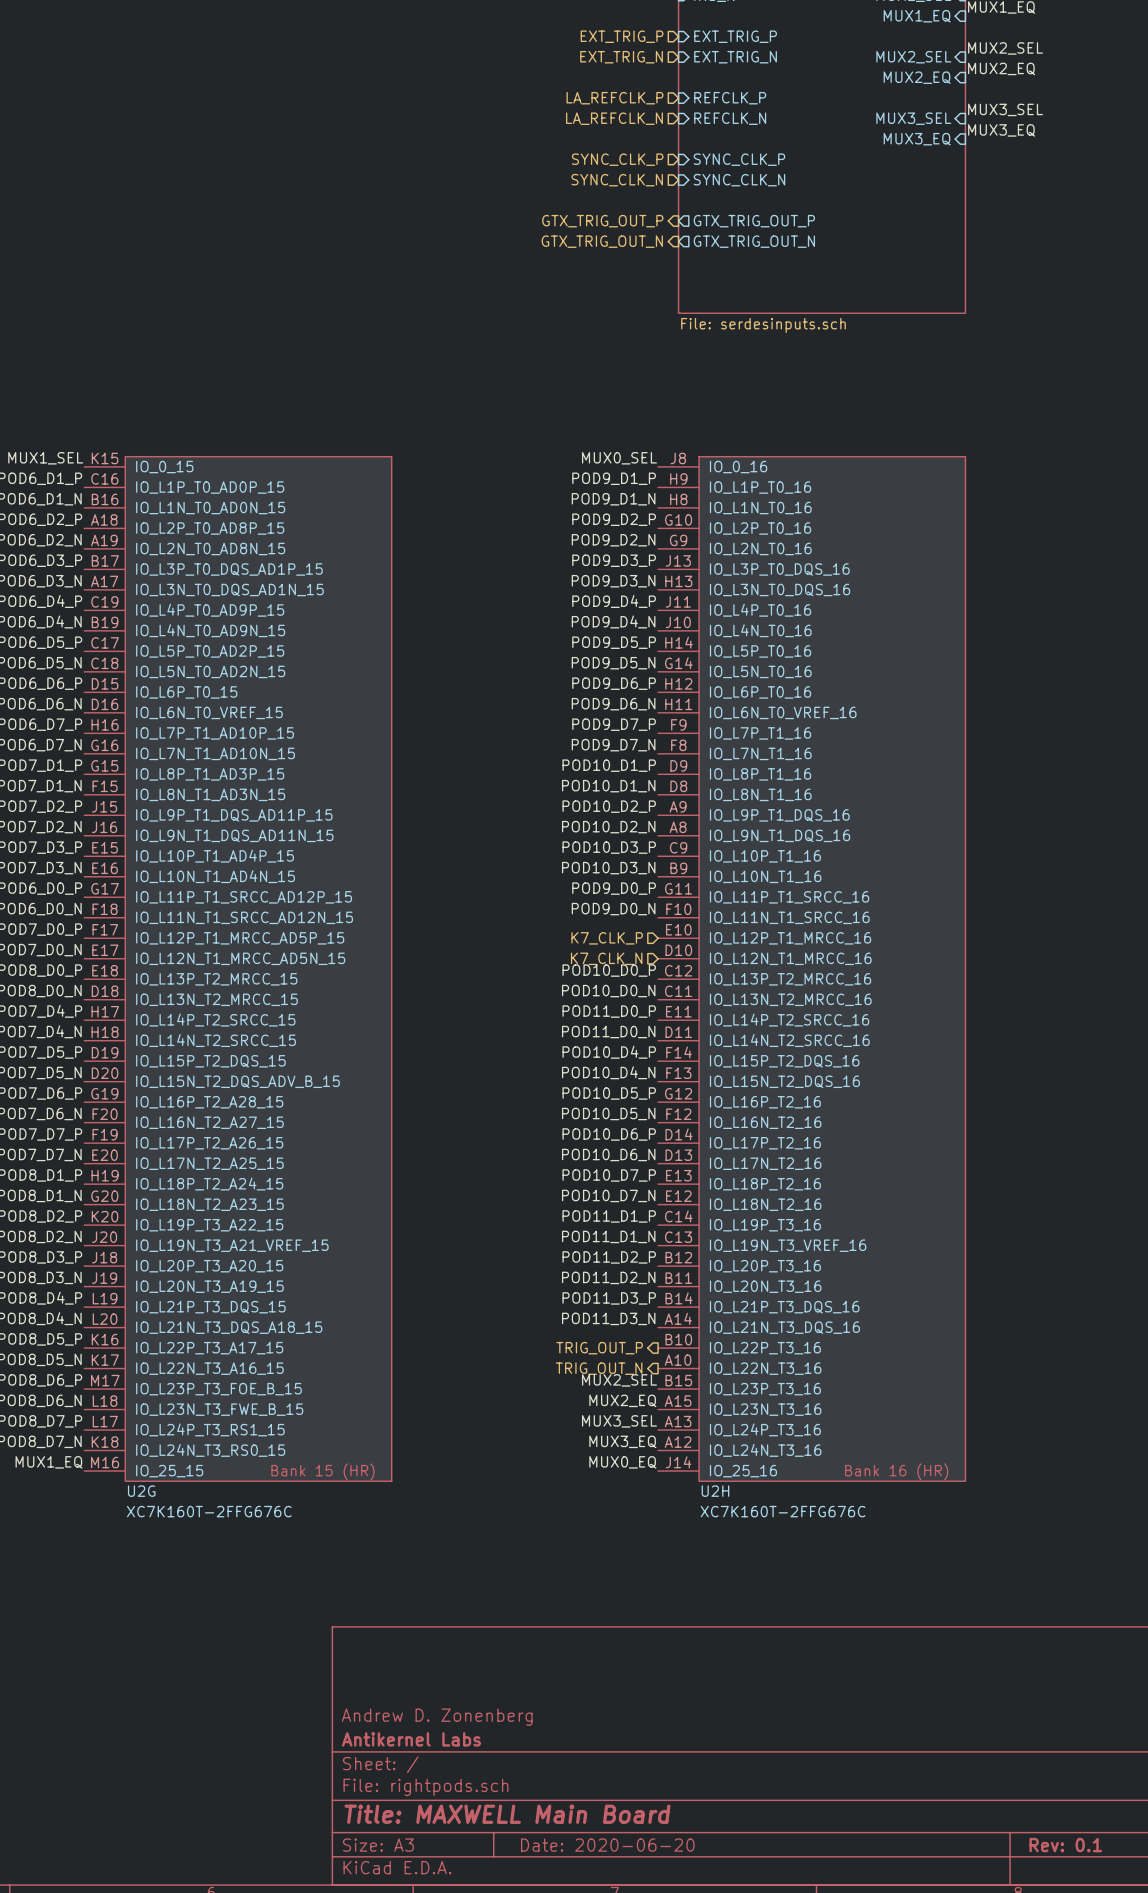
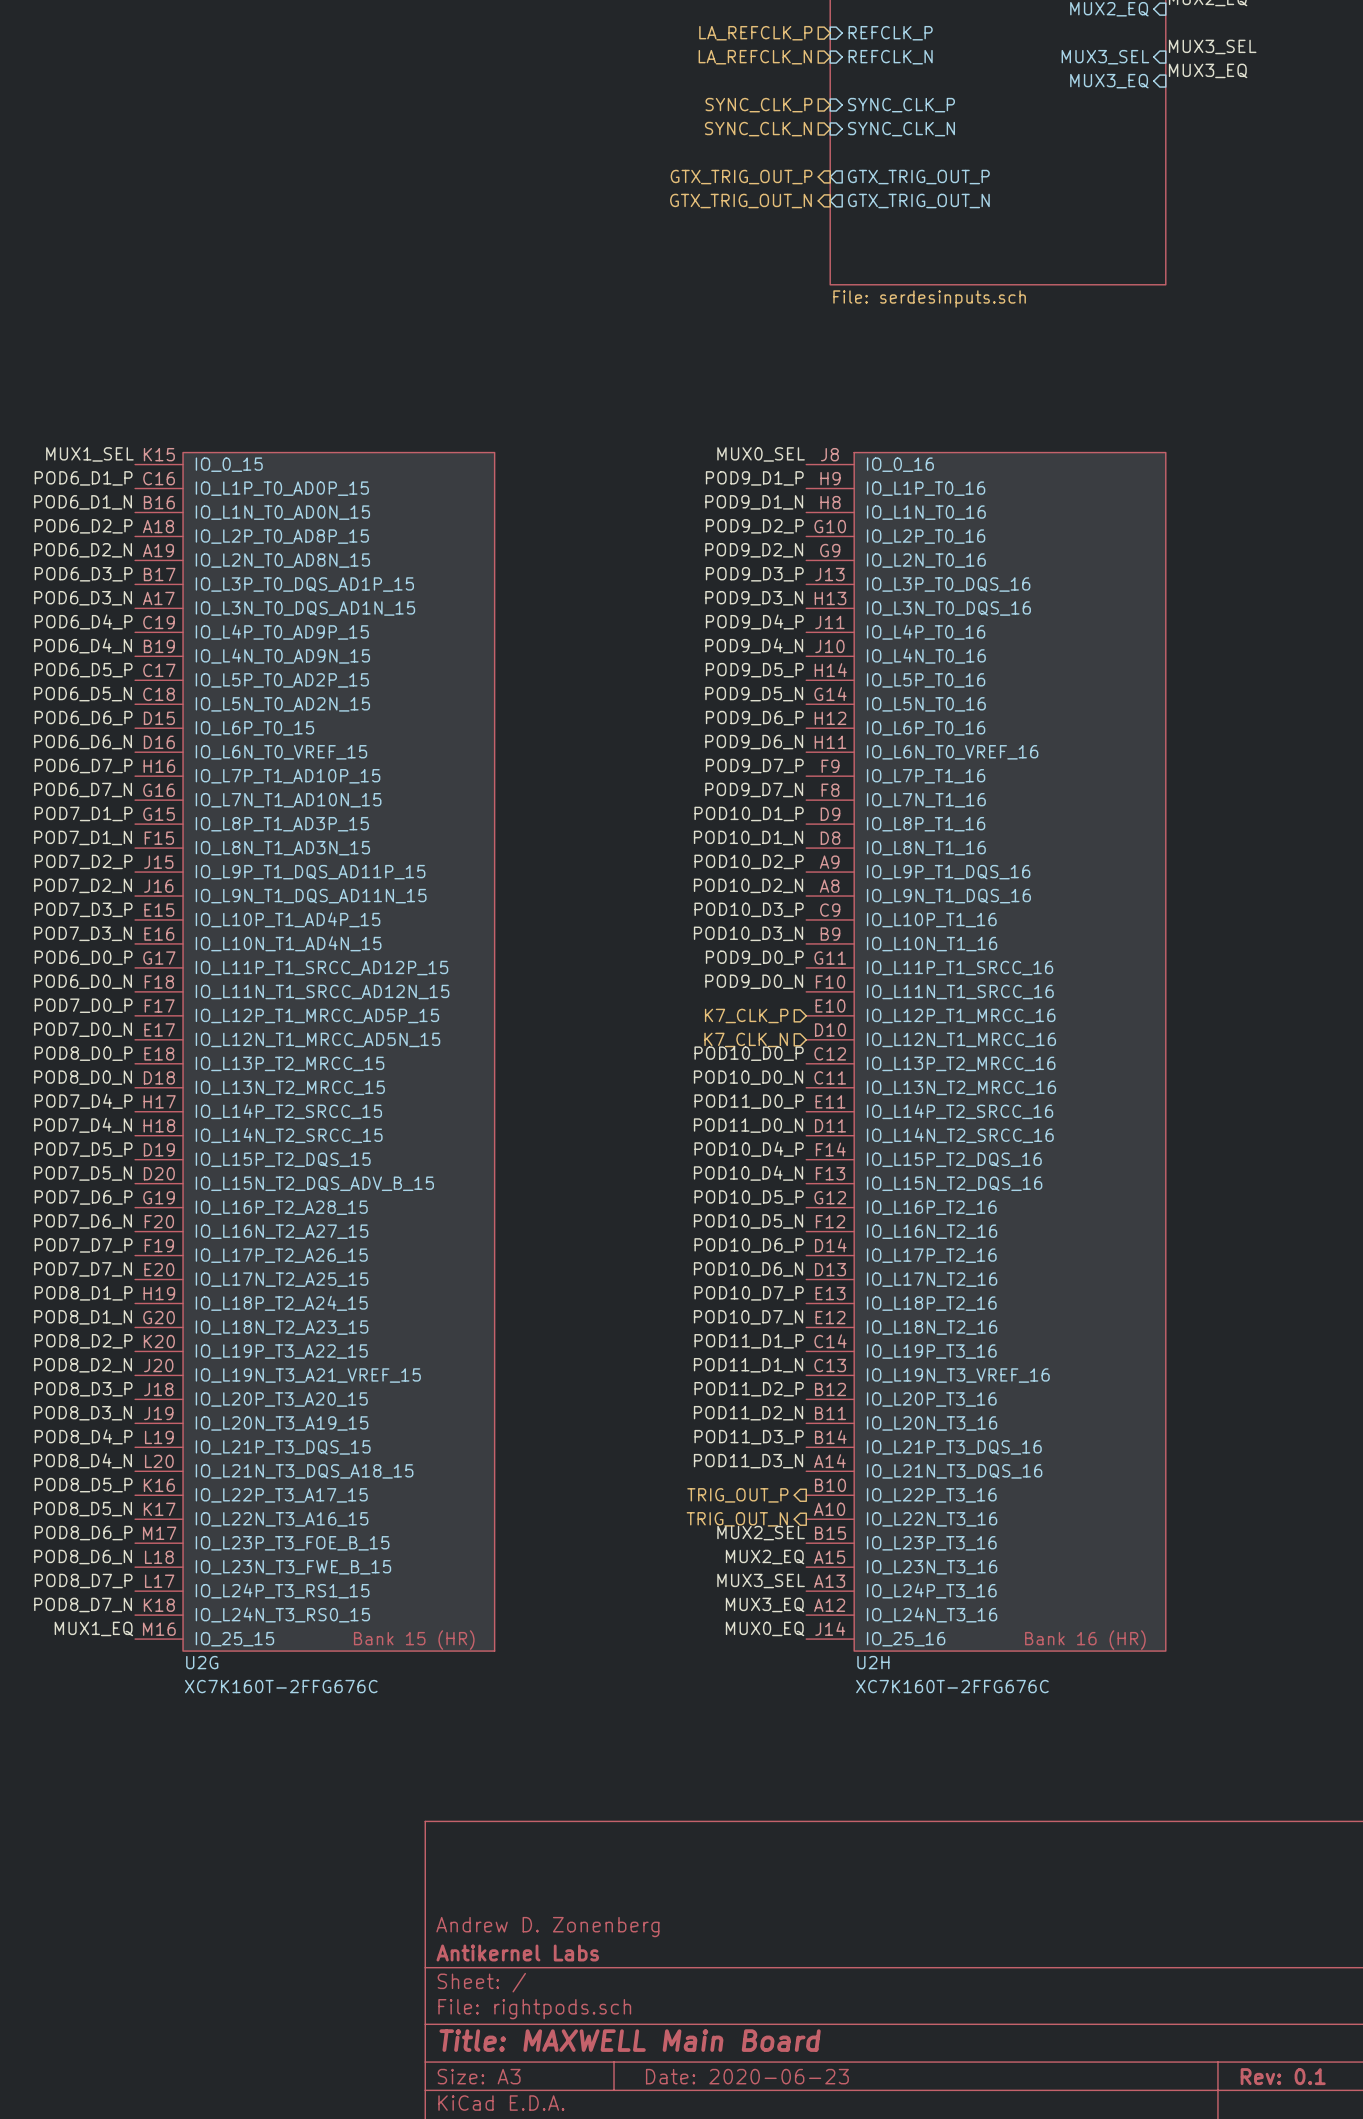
title block: Date: 2020-06-20 (607, 1845) -> Date: 2020-06-23 (747, 2076)

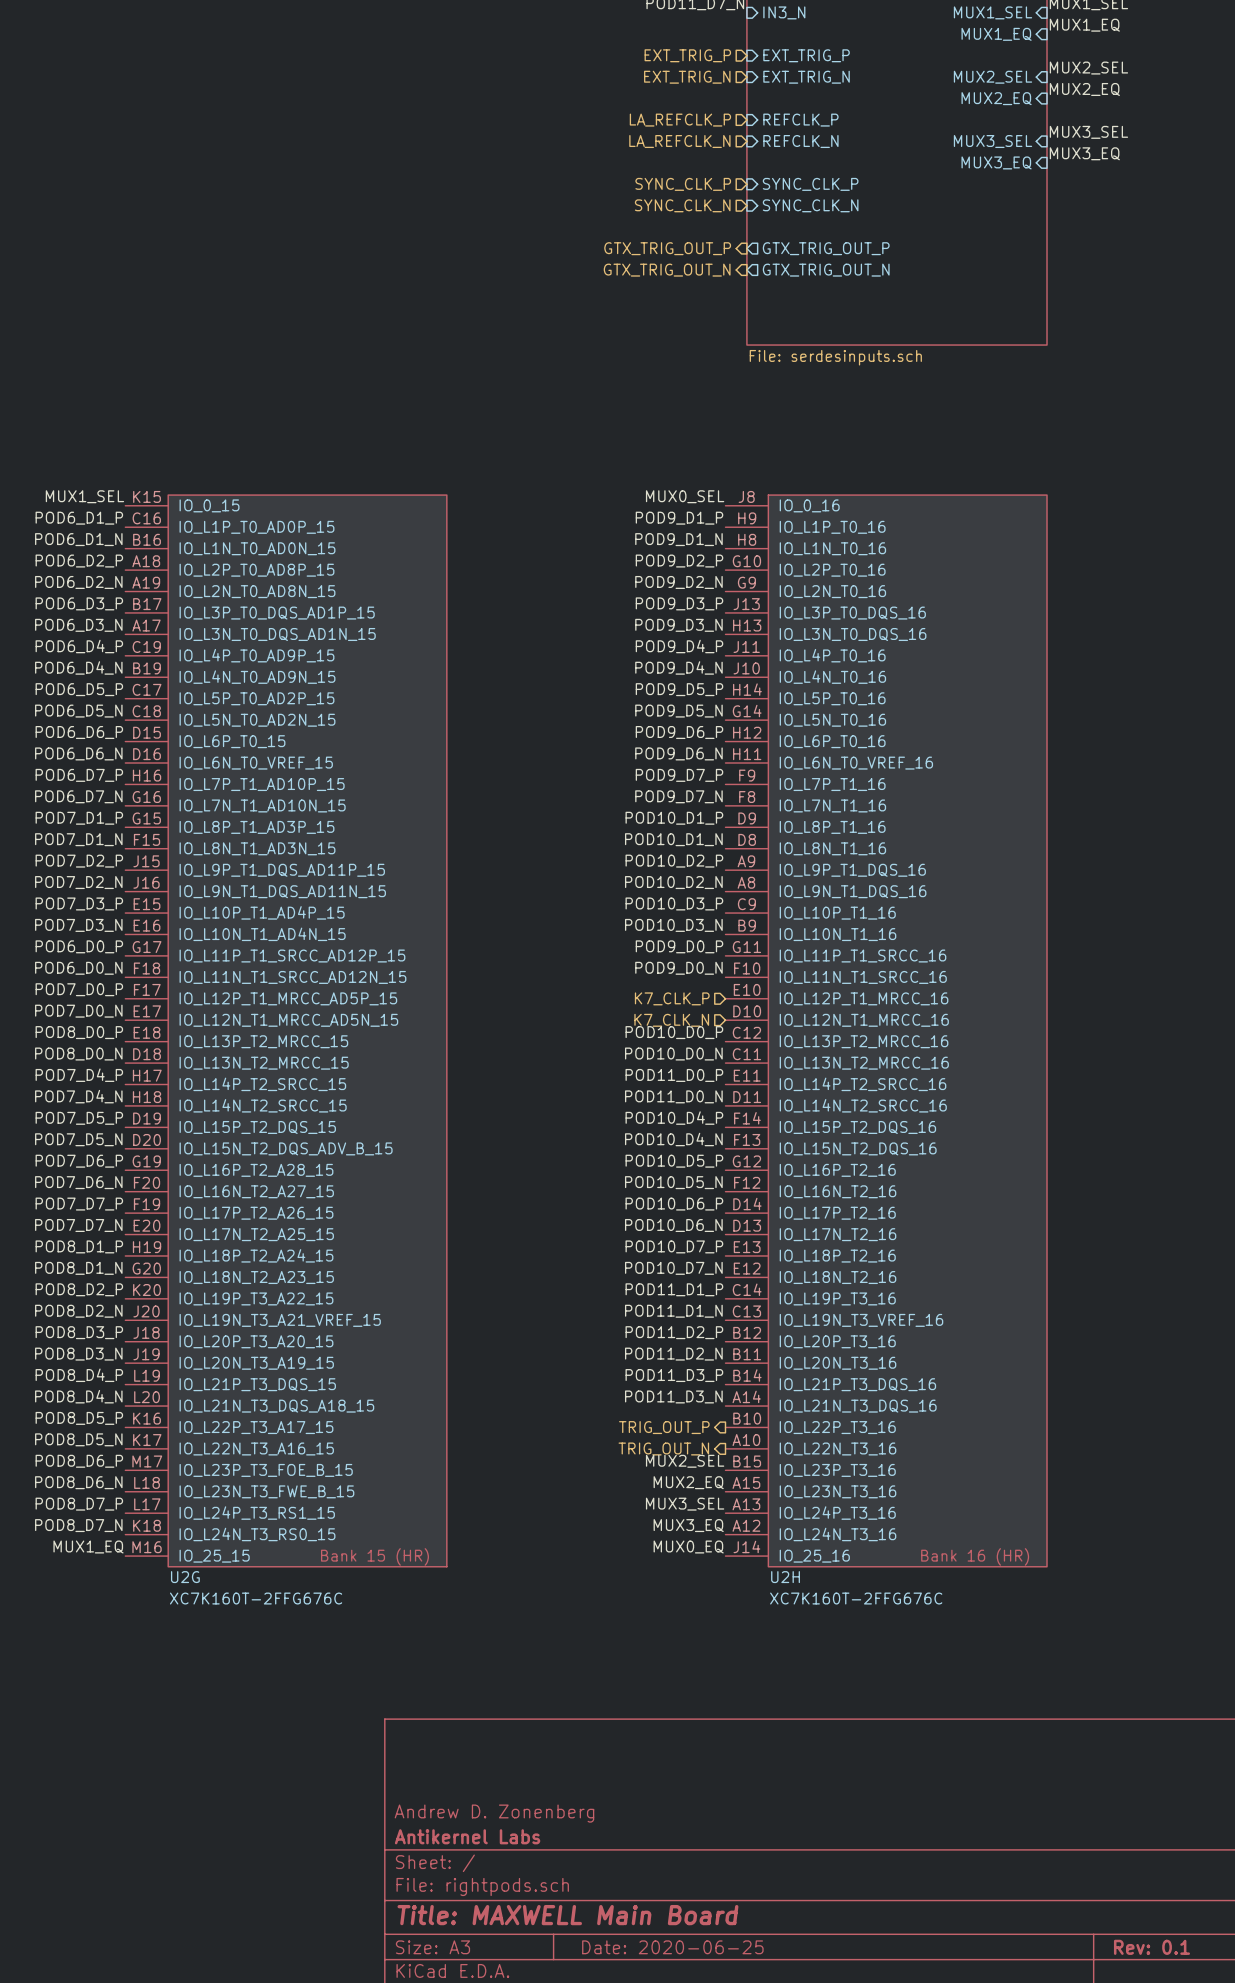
title block: Date: 2020-06-23 (747, 2076) -> Date: 2020-06-25 (672, 1947)

